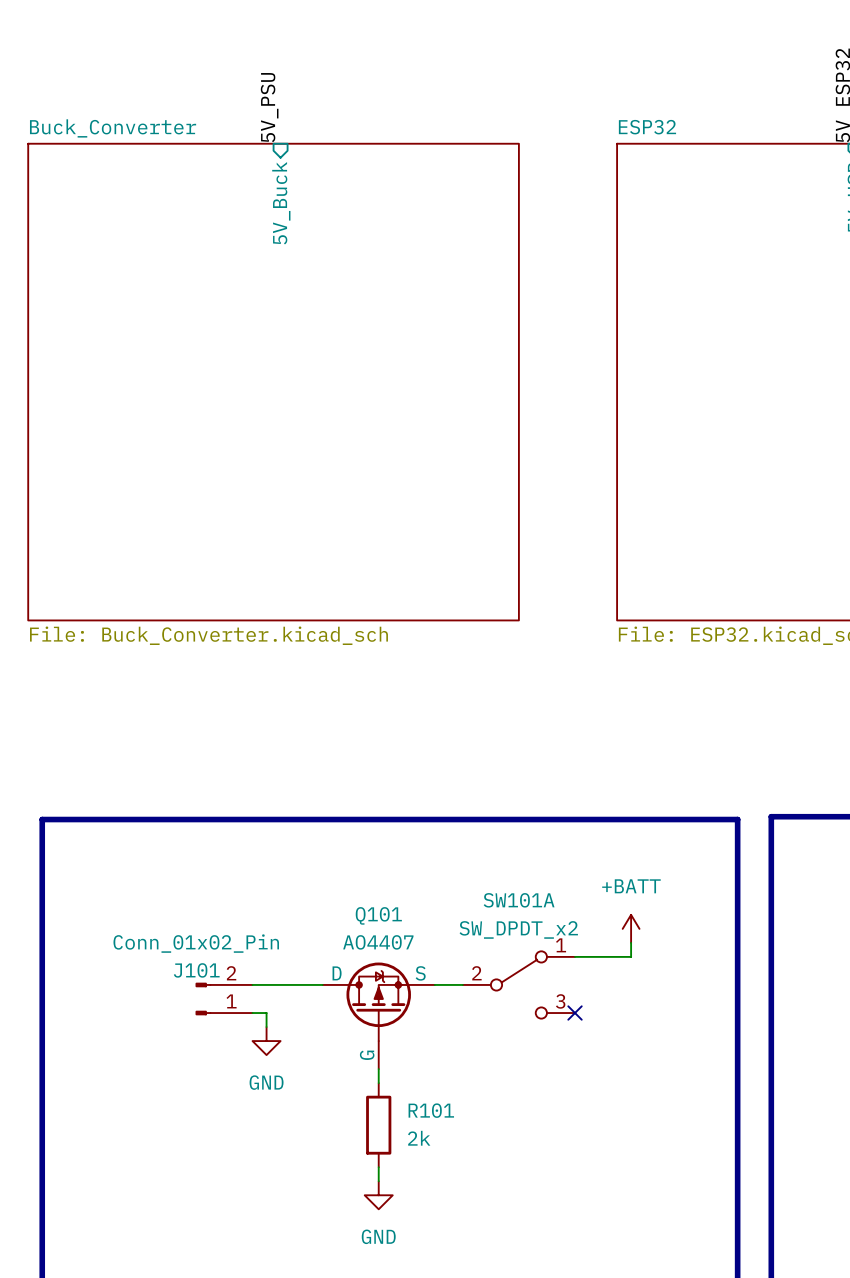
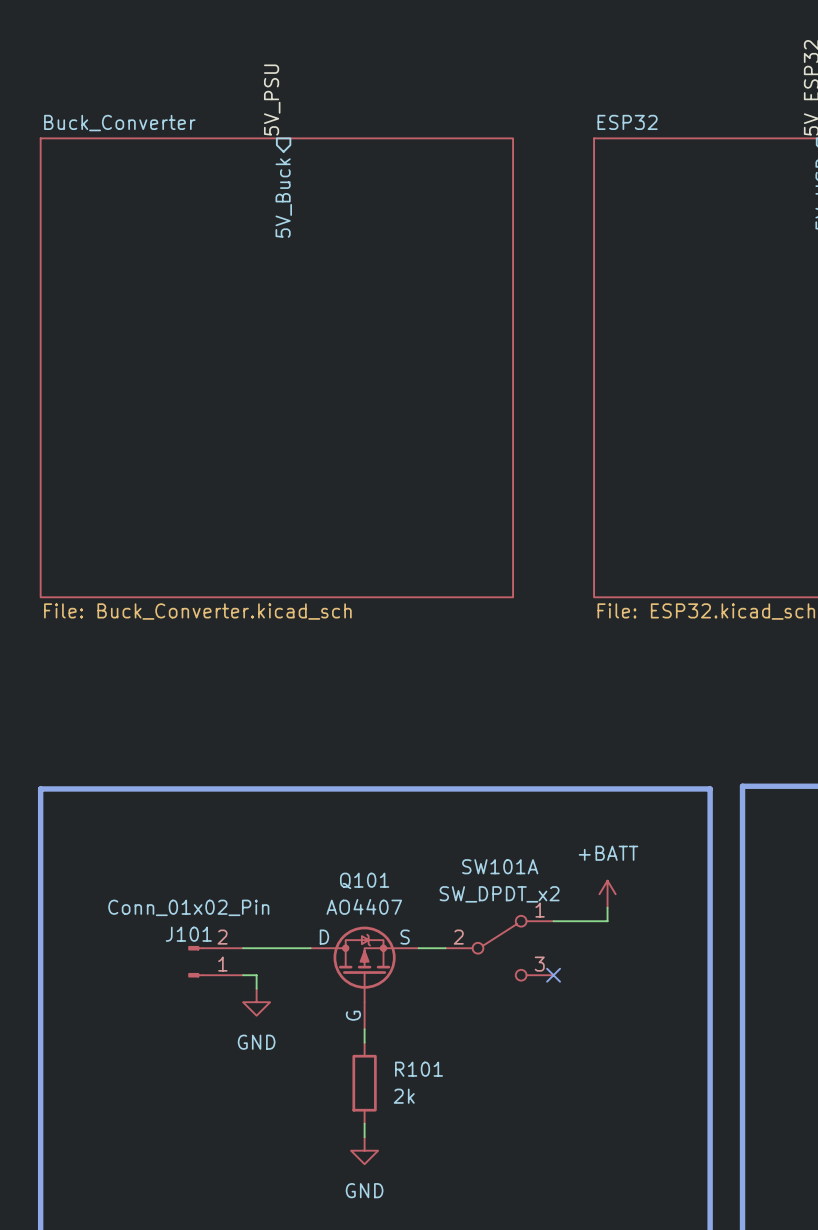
label position: 5V_PSU (269, 107) -> 5V_PSU (272, 100)
sheet pin position: 5V_Buck (281, 203) -> 5V_Buck (283, 198)
sheet Buck_Converter position: (273, 382) -> (276, 367)

